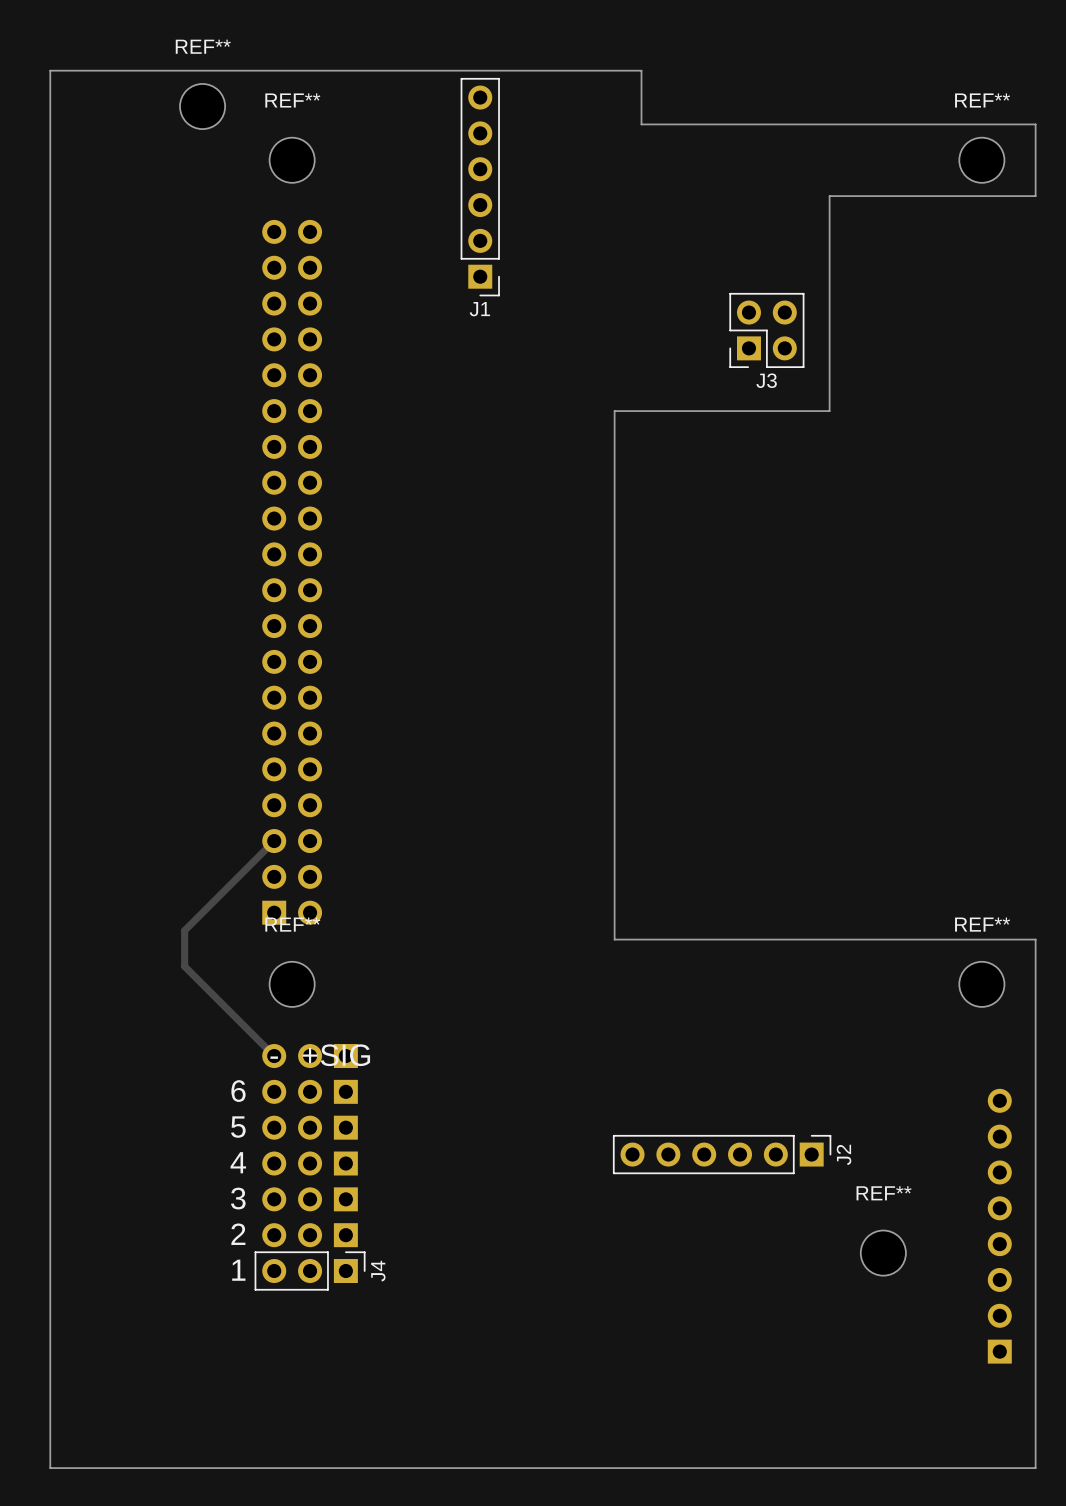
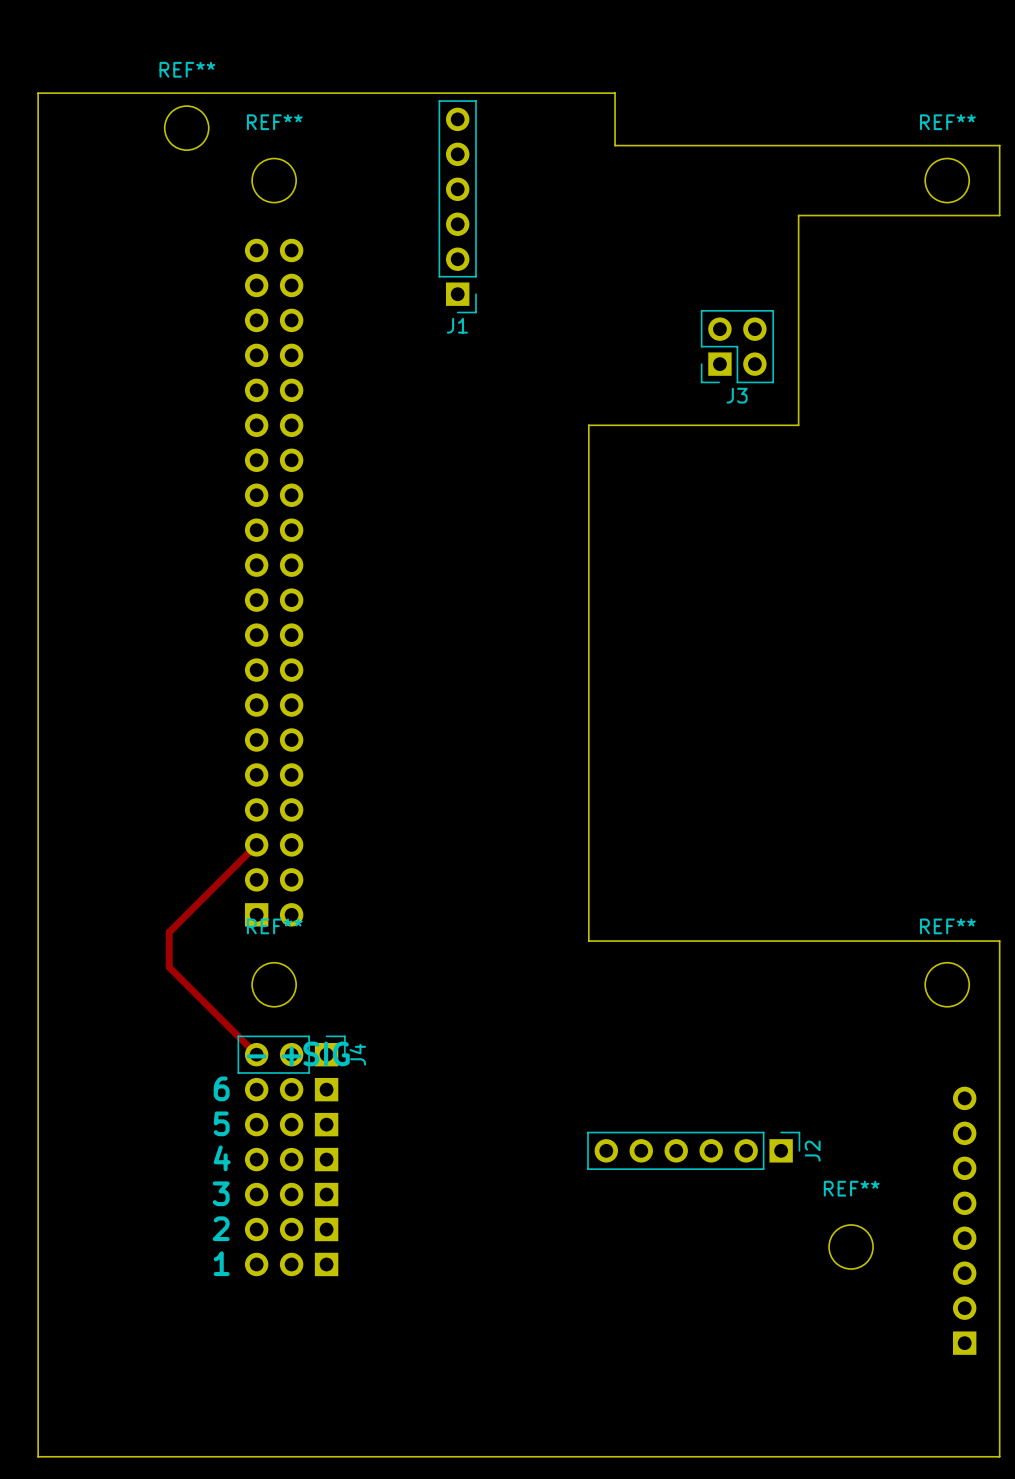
J4 position: (310, 1271) -> (291, 1054)

